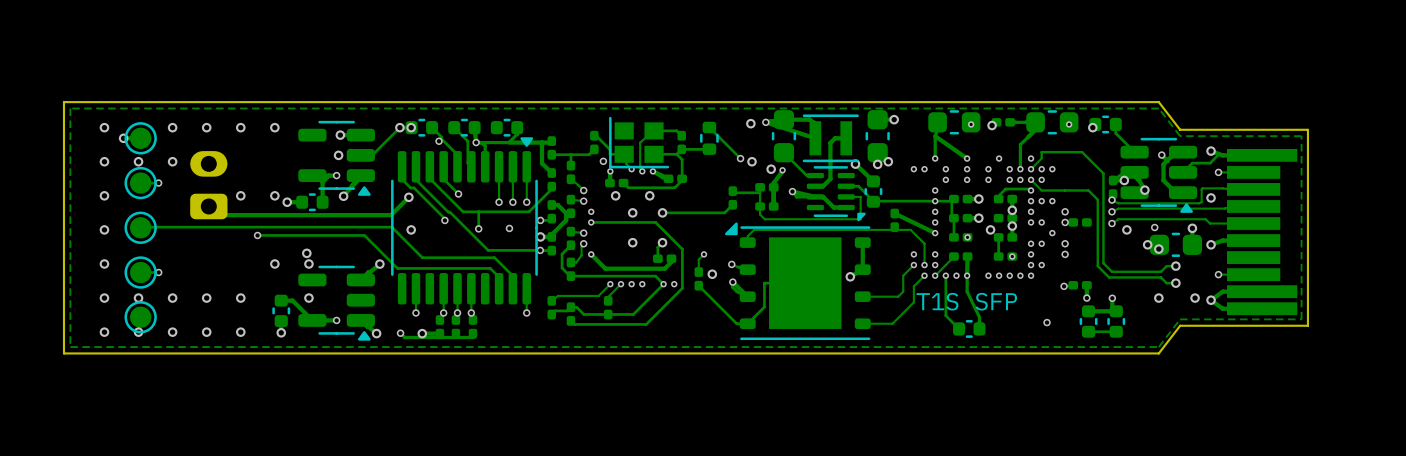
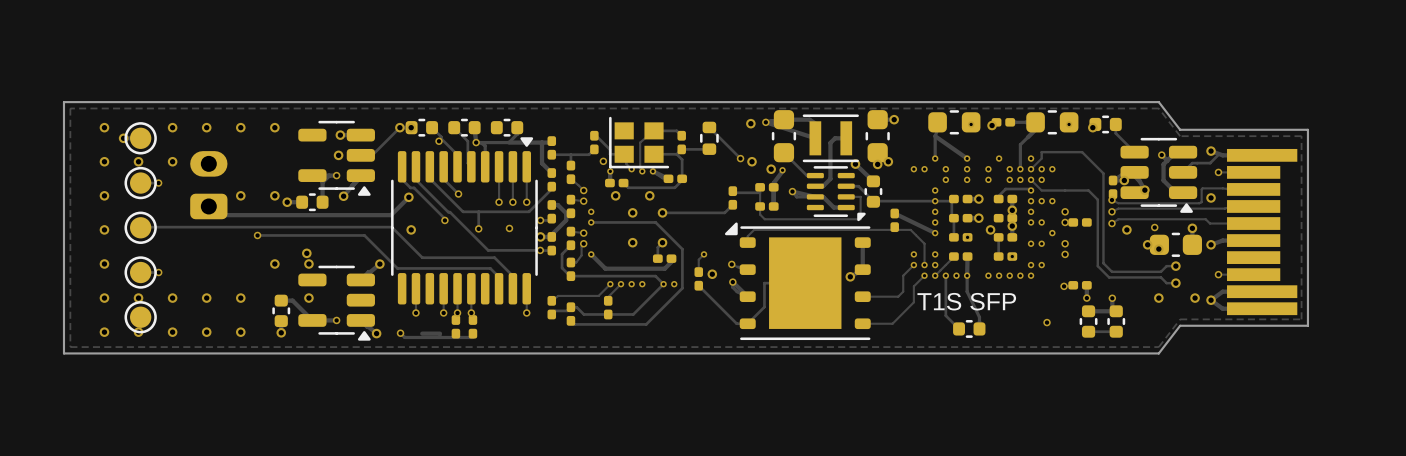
via: (1031, 254) -> none
part: (439, 326) -> none
via: (422, 333) -> none

